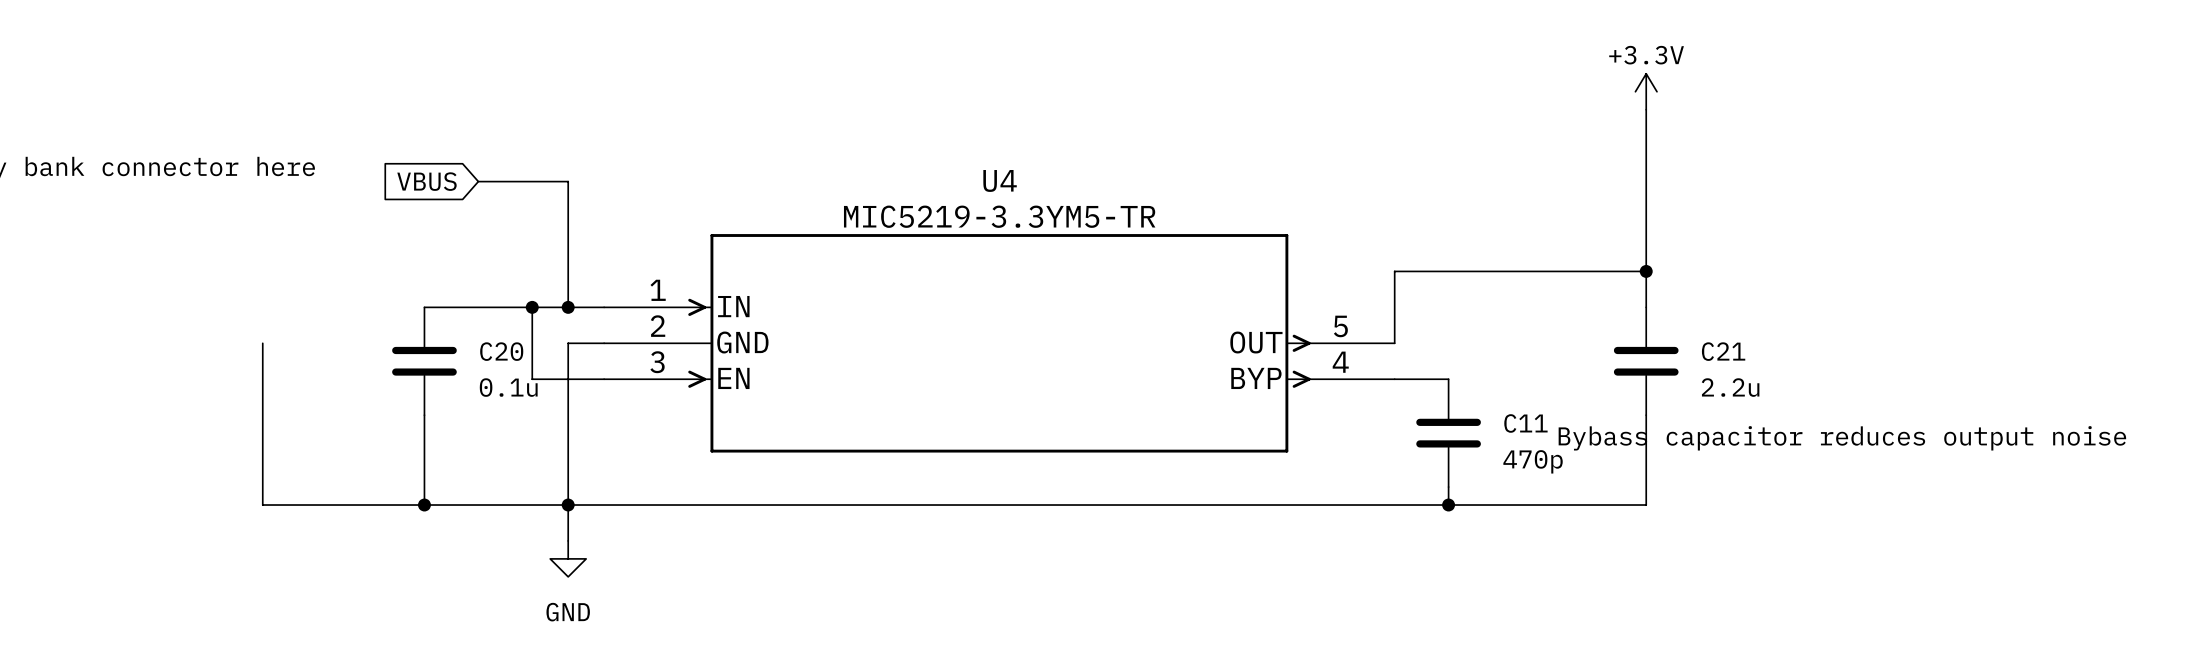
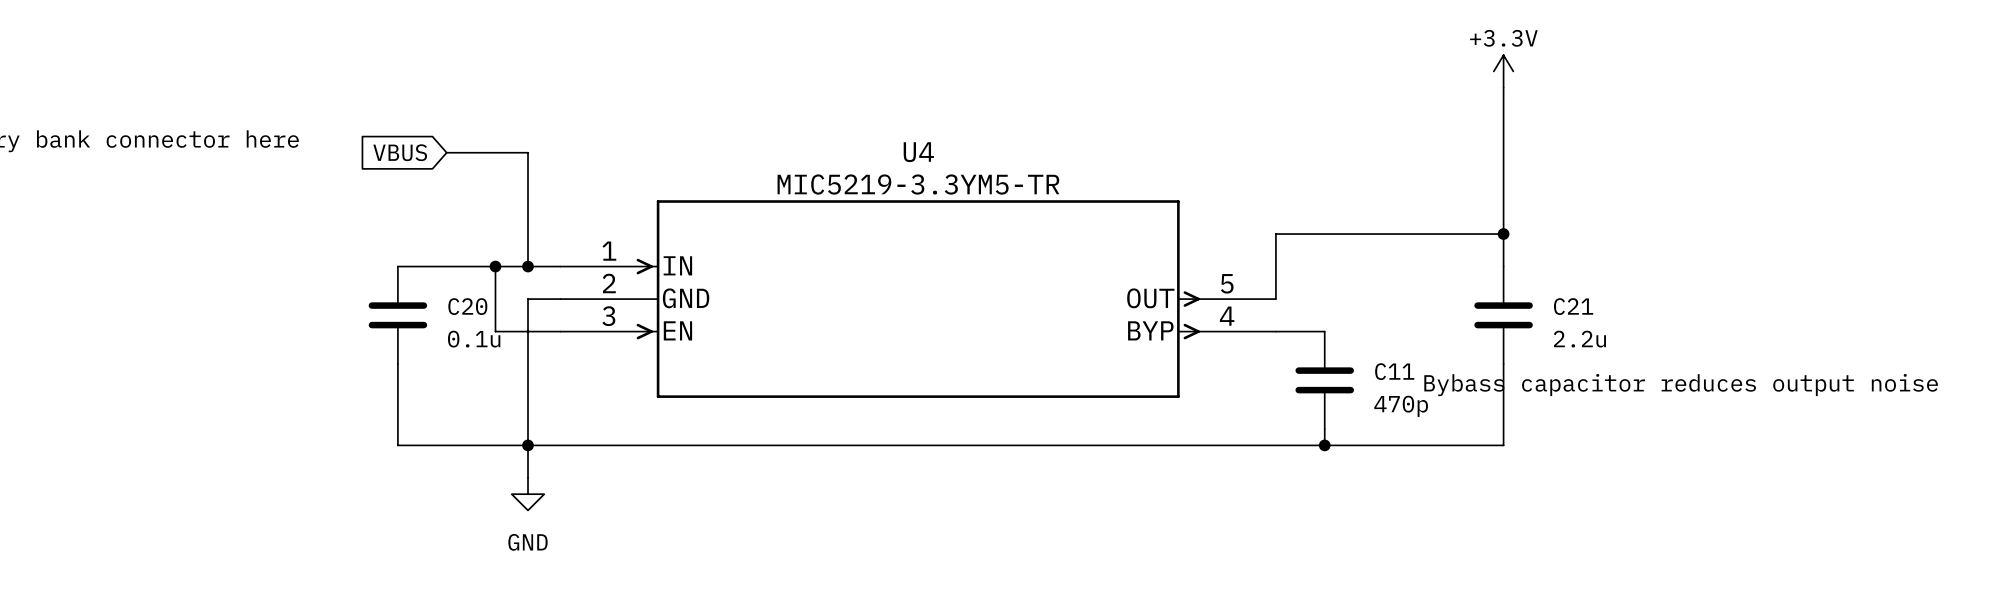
wire: (262, 343) (262, 505) (424, 505) -> none
junction: (424, 505) -> none

